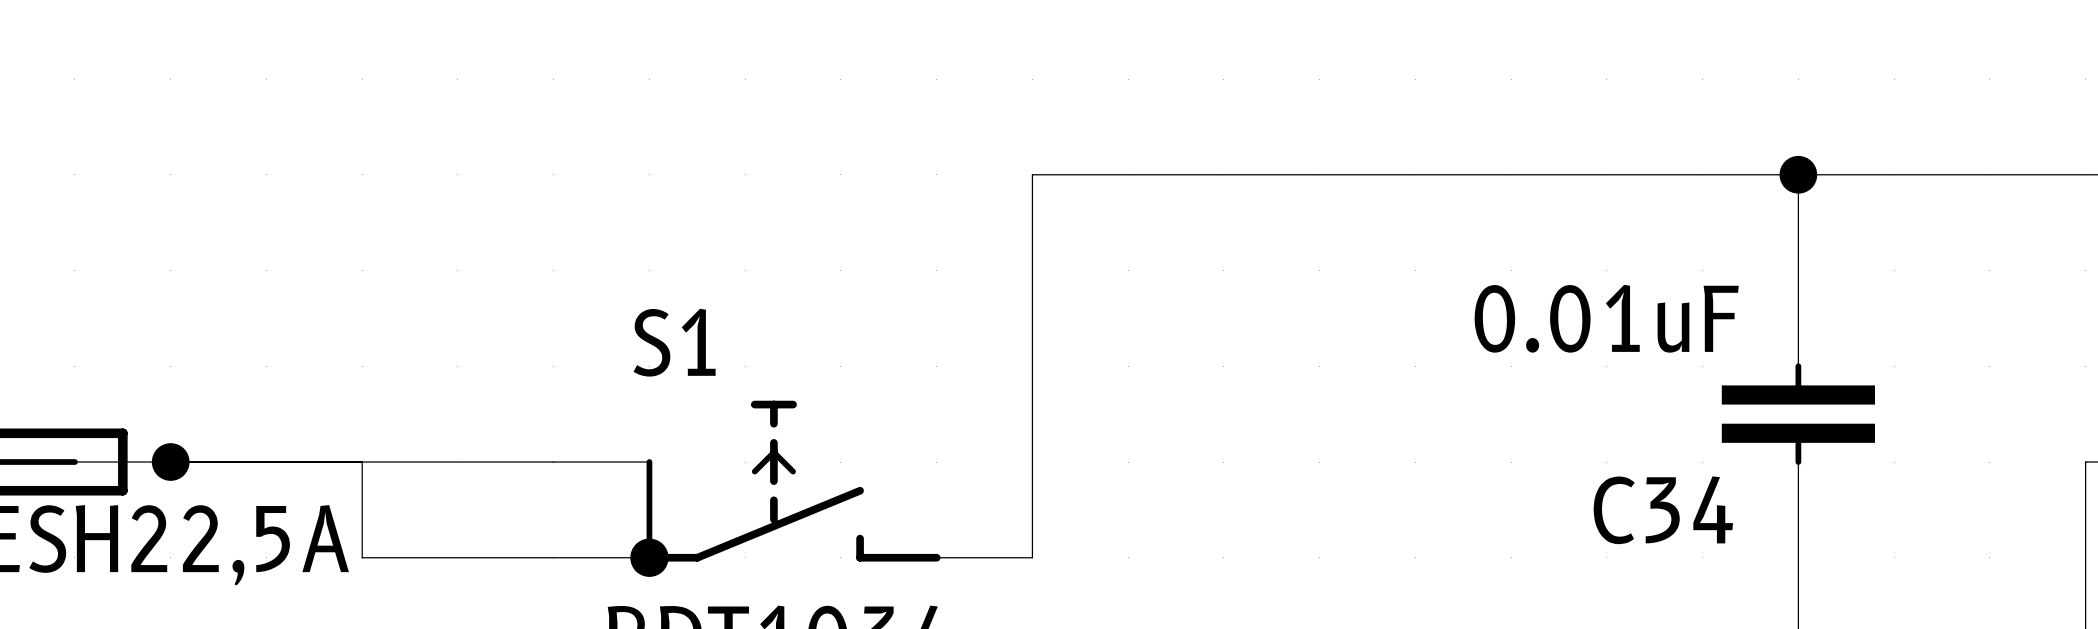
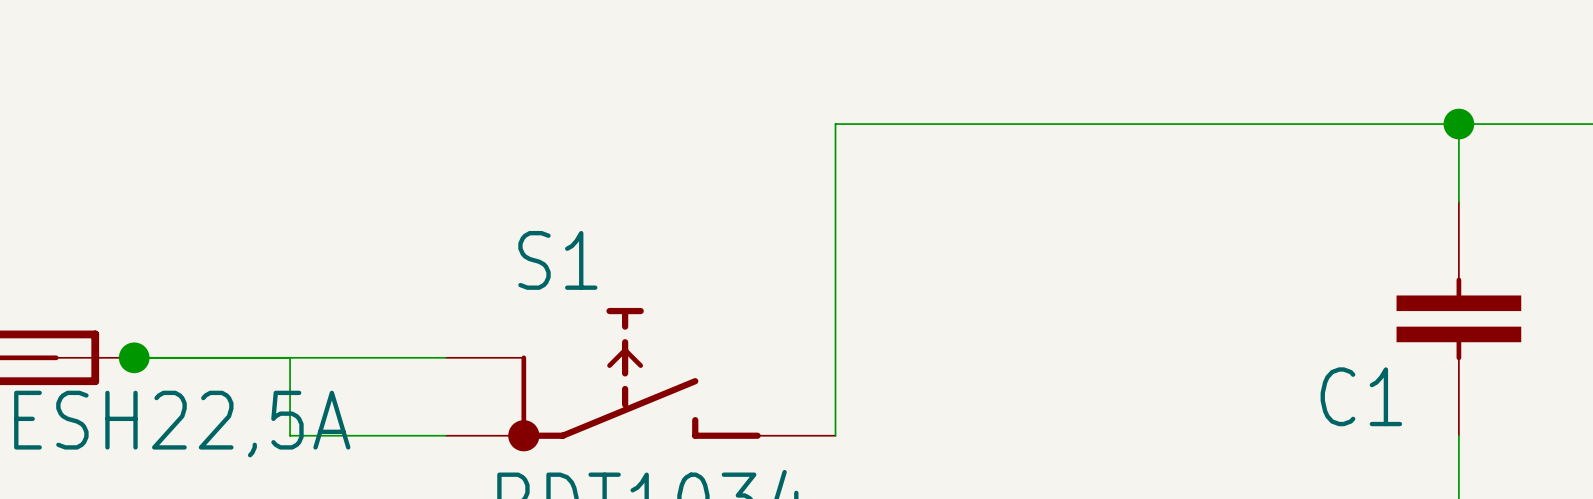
C34 value: 0.01uF (1606, 318) -> none
C34 name: C34 (1663, 510) -> C1 (1361, 396)

